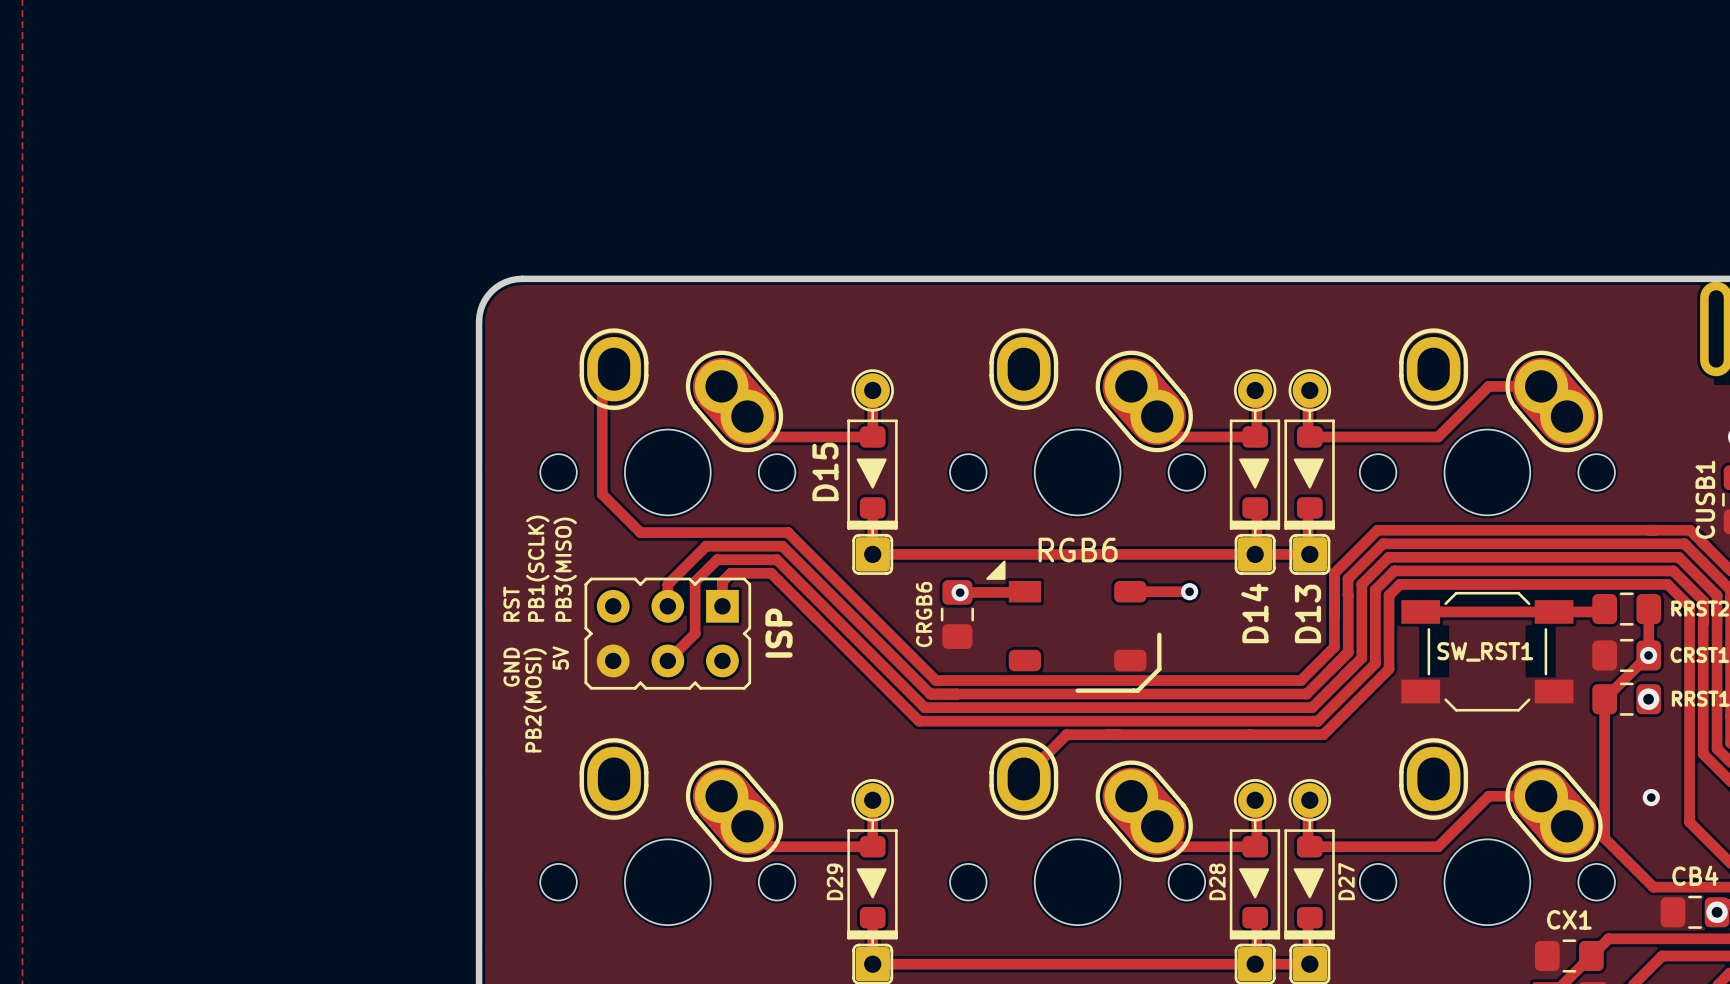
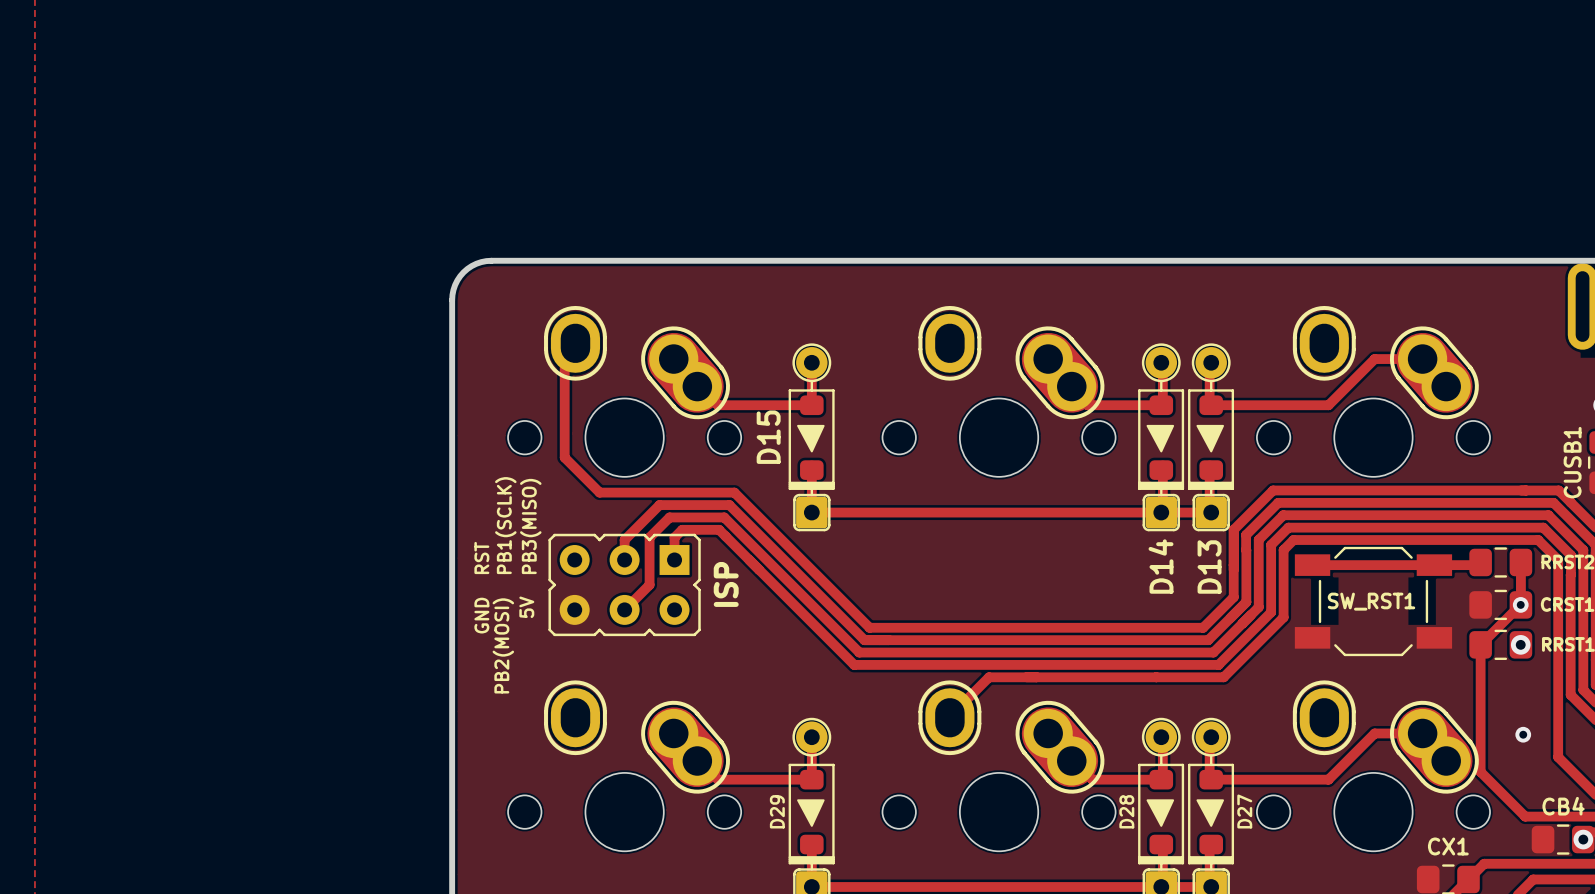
track: (1130, 591) (1189, 591) -> none
via: (1189, 591) -> none
track: (957, 592) (1025, 592) -> none
via: (960, 592) -> none
CRGB6: (957, 614) -> none
RGB6: (1073, 626) -> none

